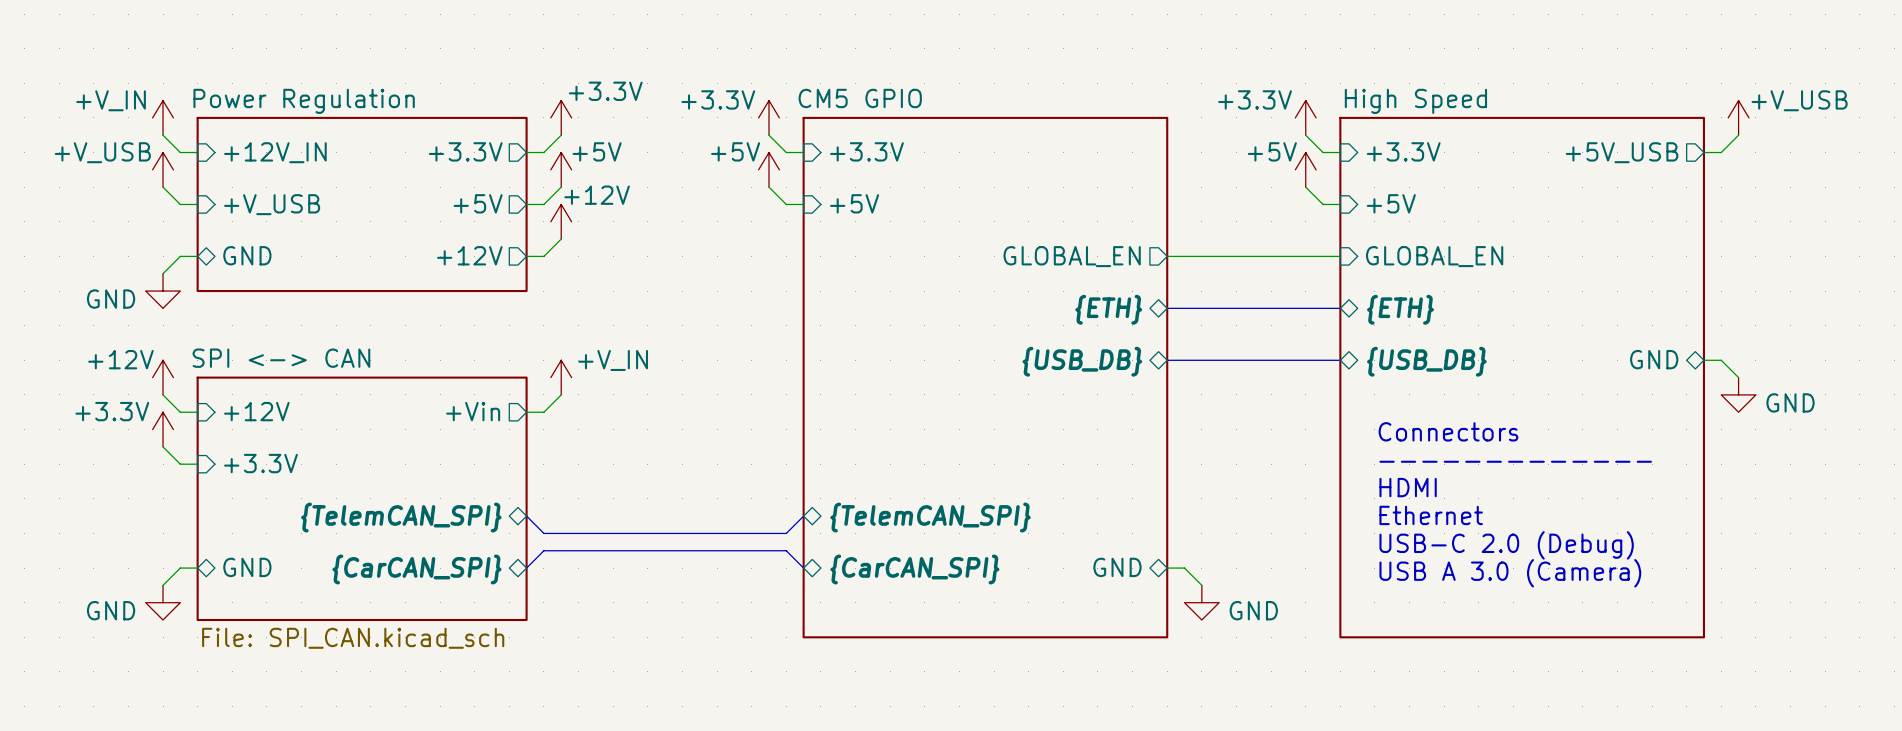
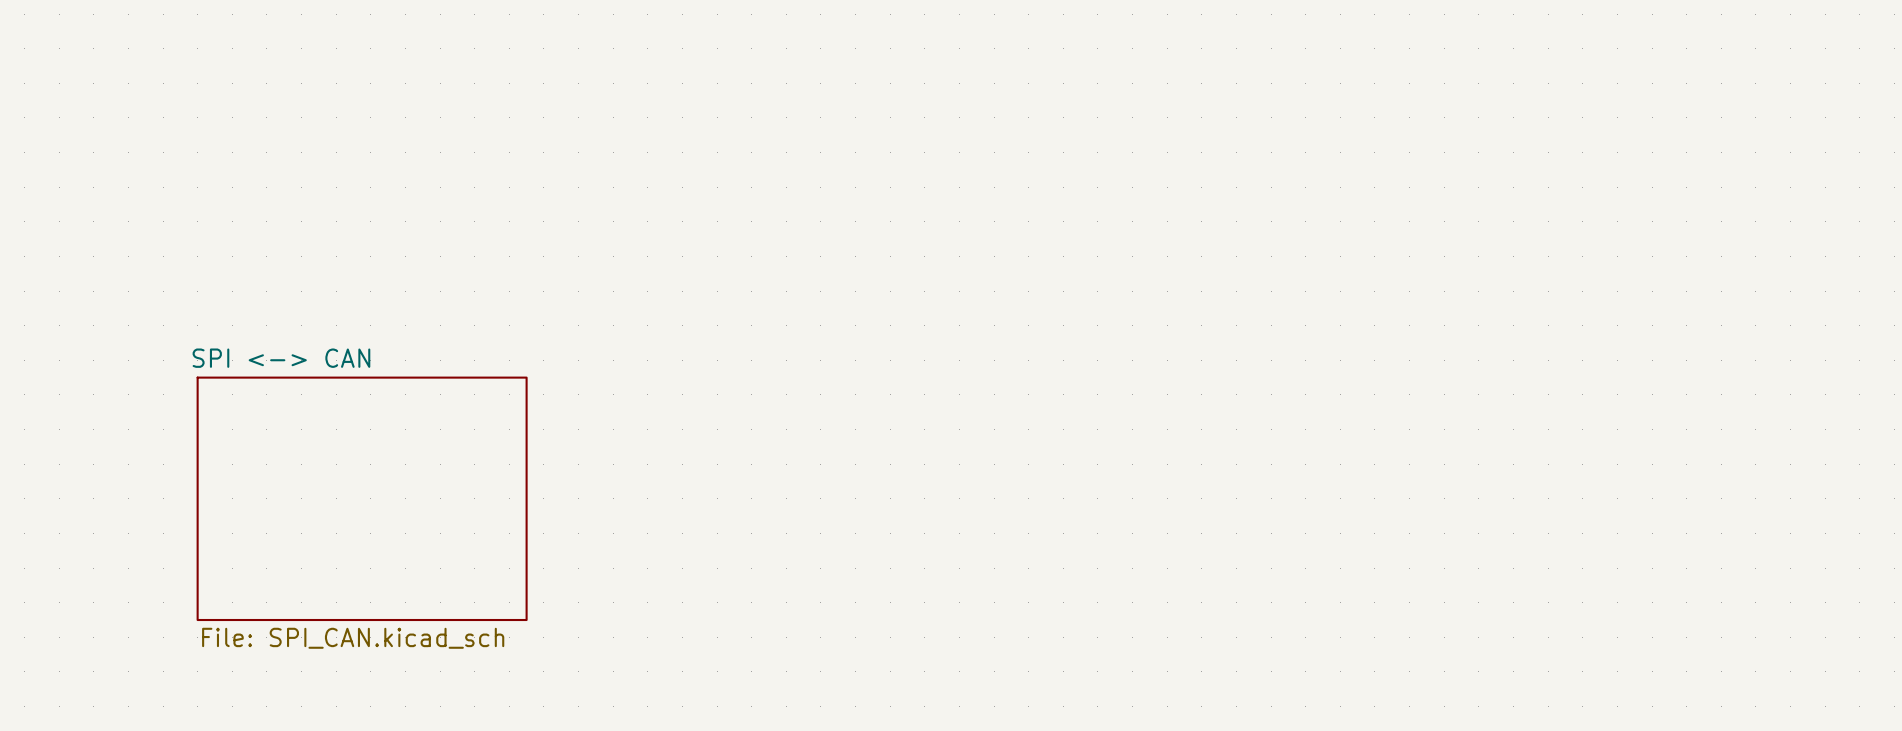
power symbol: +V_IN (163, 117) -> none
power symbol: +3.3V (561, 117) -> none
power symbol: +3.3V (769, 117) -> none
power symbol: +3.3V (1305, 117) -> none
power symbol: +V_USB (1738, 117) -> none
wire: (163, 135) (180, 152) (197, 152) -> none
wire: (561, 135) (543, 152) (526, 152) -> none
wire: (769, 135) (786, 152) (803, 152) -> none
wire: (1305, 135) (1323, 152) (1340, 152) -> none
wire: (1738, 135) (1721, 152) (1703, 152) -> none
sheet pin: +3.3V (465, 151) -> none
sheet pin: +3.3V (866, 151) -> none
sheet pin: +3.3V (1403, 151) -> none
sheet pin: +12V_IN (275, 152) -> none
sheet pin: +5V_USB (1622, 152) -> none
power symbol: +V_USB (163, 169) -> none
power symbol: +5V (561, 169) -> none
power symbol: +5V (769, 169) -> none
power symbol: +5V (1305, 169) -> none
wire: (163, 187) (180, 204) (197, 204) -> none
wire: (561, 187) (543, 204) (526, 204) -> none
wire: (769, 187) (786, 204) (803, 204) -> none
wire: (1305, 187) (1323, 204) (1340, 204) -> none
sheet pin: +5V (478, 203) -> none
sheet pin: +5V (854, 203) -> none
sheet pin: +5V (1391, 203) -> none
sheet pin: +V_USB (272, 204) -> none
sheet Power Regulation: (362, 204) -> none
power symbol: +12V (561, 221) -> none
wire: (561, 239) (543, 256) (526, 256) -> none
sheet pin: GND (247, 255) -> none
sheet pin: +12V (469, 255) -> none
wire: (197, 256) (180, 256) (163, 273) -> none
sheet pin: GLOBAL_EN (1072, 256) -> none
wire: (1167, 256) (1340, 256) -> none
sheet pin: GLOBAL_EN (1434, 256) -> none
power symbol: GND (163, 291) -> none
bus: (1167, 308) (1340, 308) -> none
sheet pin: {ETH} (1108, 309) -> none
sheet pin: {ETH} (1400, 309) -> none
sheet pin: GND (1654, 359) -> none
bus: (1167, 360) (1340, 360) -> none
wire: (1703, 360) (1721, 360) (1738, 377) -> none
sheet pin: {USB_DB} (1082, 361) -> none
sheet pin: {USB_DB} (1426, 361) -> none
power symbol: +12V (163, 377) -> none
power symbol: +V_IN (561, 377) -> none
sheet CM5 GPIO: (985, 377) -> none
sheet High Speed: (1522, 377) -> none
wire: (163, 394) (180, 412) (197, 412) -> none
wire: (561, 394) (543, 412) (526, 412) -> none
power symbol: GND (1738, 394) -> none
sheet pin: +12V (256, 411) -> none
sheet pin: +Vin (473, 411) -> none
power symbol: +3.3V (163, 429) -> none
text: Connectors (1448, 431) -> none
wire: (163, 446) (180, 464) (197, 464) -> none
text: ------------- (1515, 461) -> none
sheet pin: +3.3V (260, 463) -> none
text: HDMI (1408, 487) -> none
text: Ethernet (1431, 515) -> none
bus: (526, 516) (543, 533) (786, 533) (803, 516) -> none
sheet pin: {TelemCAN_SPI} (401, 517) -> none
sheet pin: {TelemCAN_SPI} (930, 517) -> none
text: USB-C 2.0 (Debug) (1506, 545) -> none
sheet pin: GND (247, 567) -> none
sheet pin: GND (1117, 567) -> none
wire: (197, 568) (180, 568) (163, 585) -> none
bus: (526, 568) (543, 550) (786, 550) (803, 568) -> none
wire: (1167, 568) (1184, 568) (1201, 585) -> none
sheet pin: {CarCAN_SPI} (417, 569) -> none
sheet pin: {CarCAN_SPI} (914, 569) -> none
text: USB A 3.0 (Camera) (1510, 573) -> none
power symbol: GND (163, 602) -> none
power symbol: GND (1201, 602) -> none

